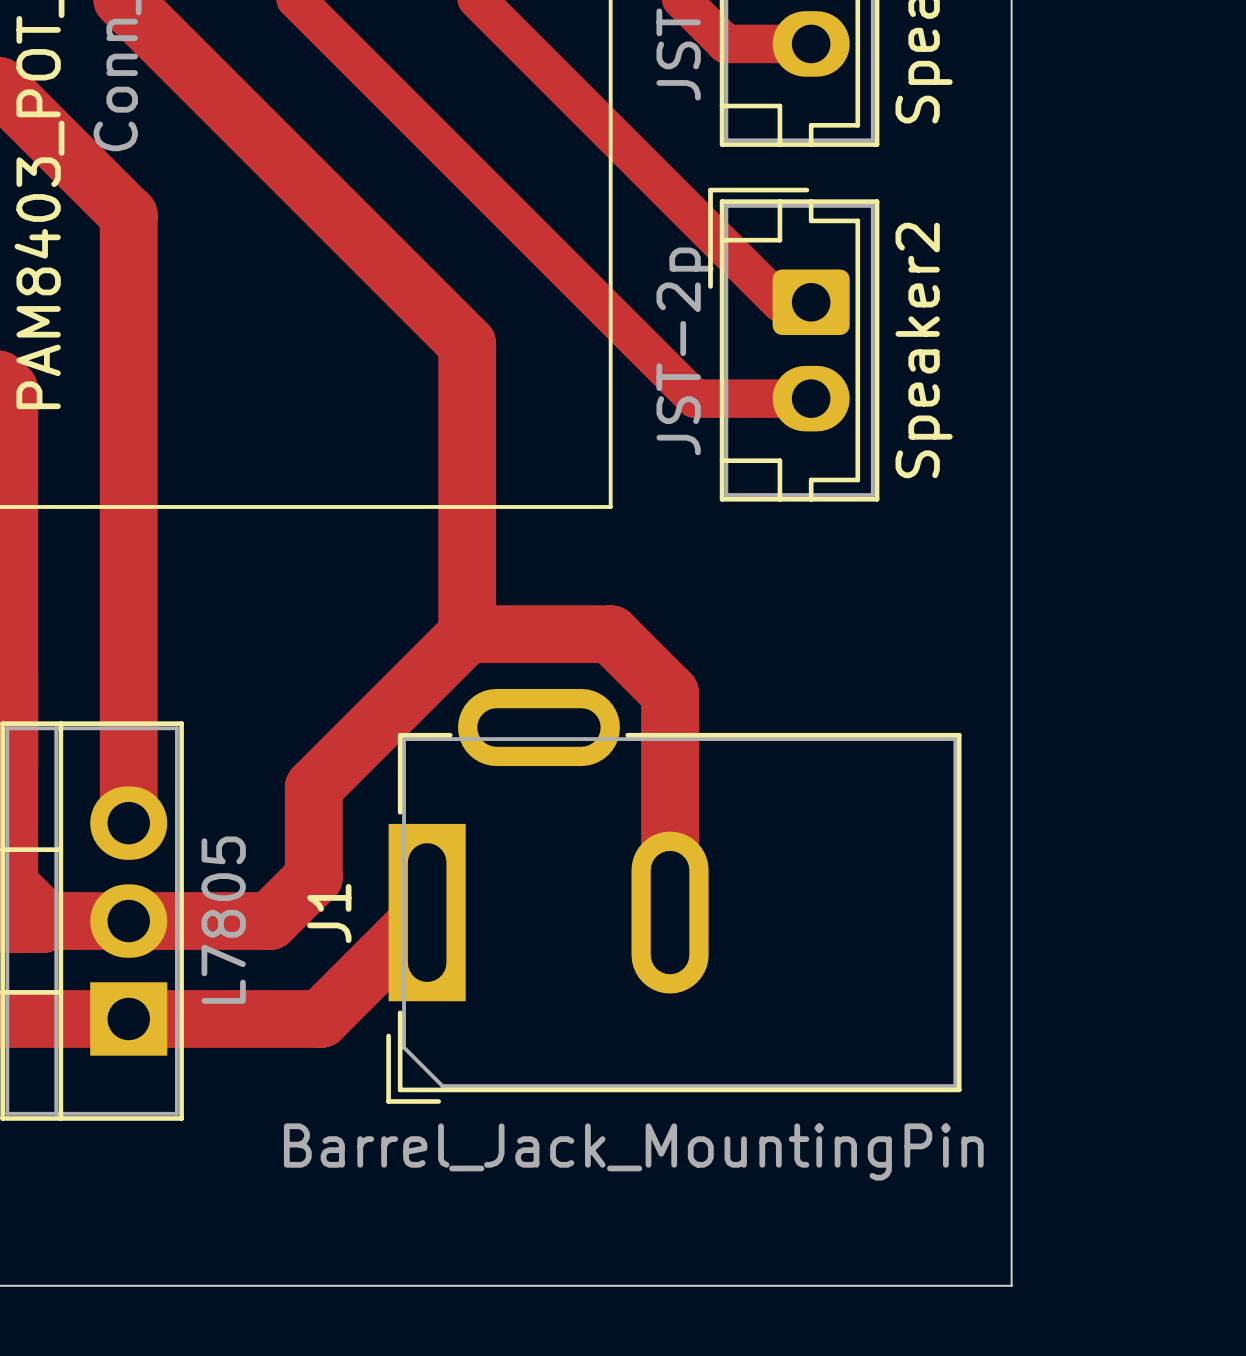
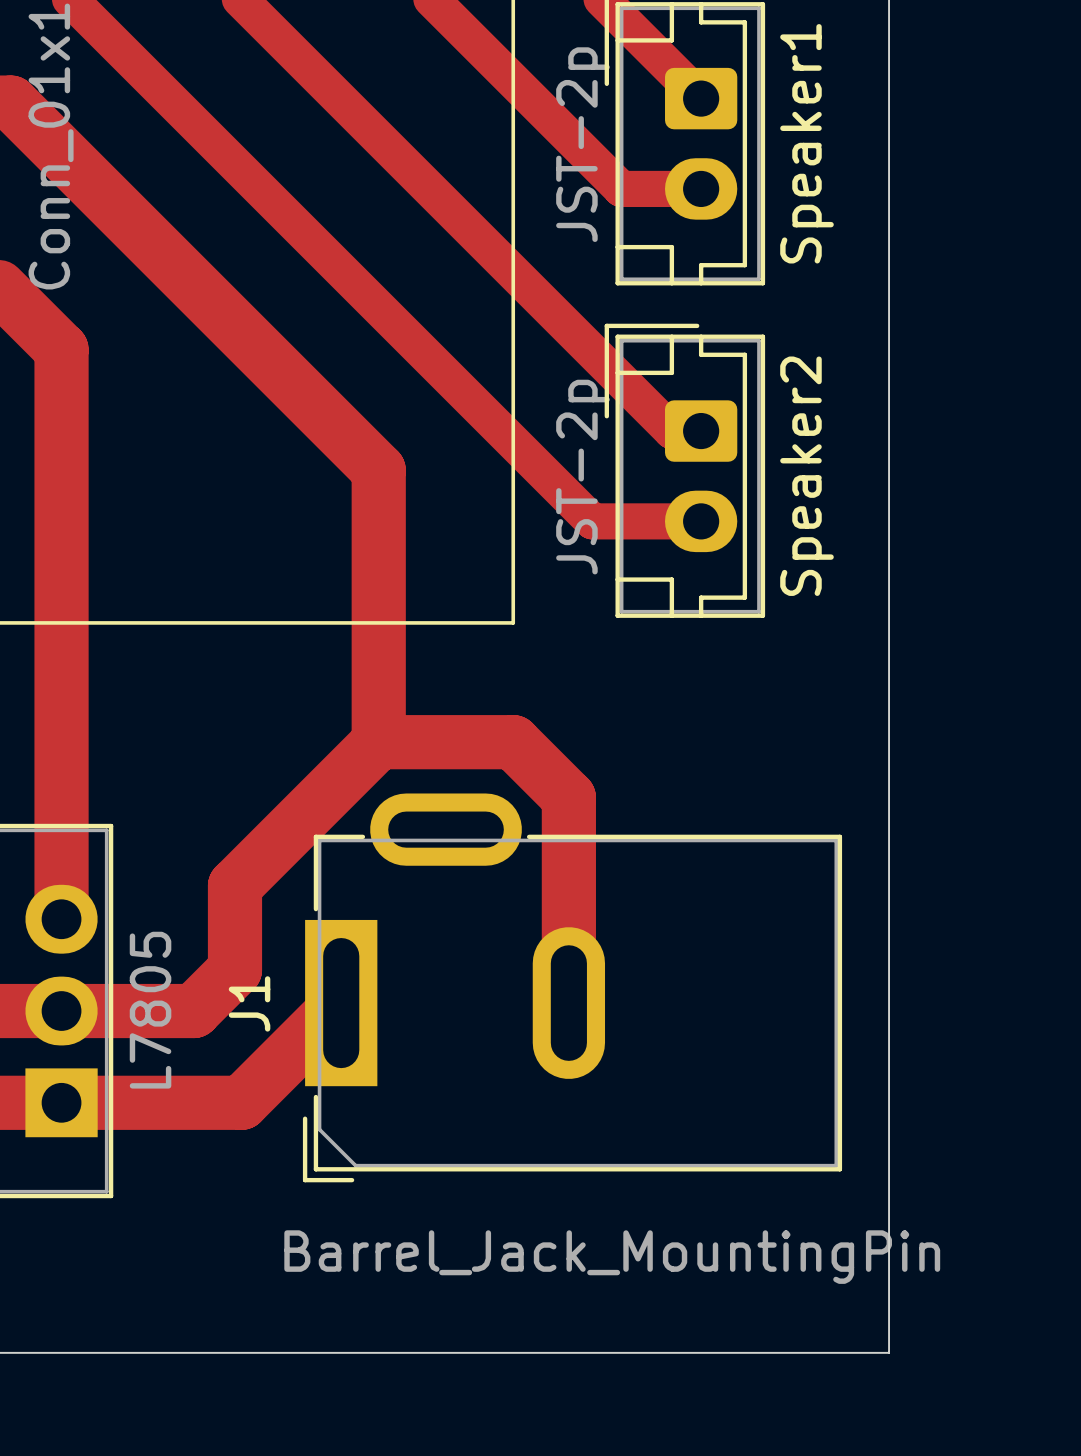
J1 value position: Barrel_Jack_MountingPin (633, 1151) -> Barrel_Jack_MountingPin (612, 1257)

